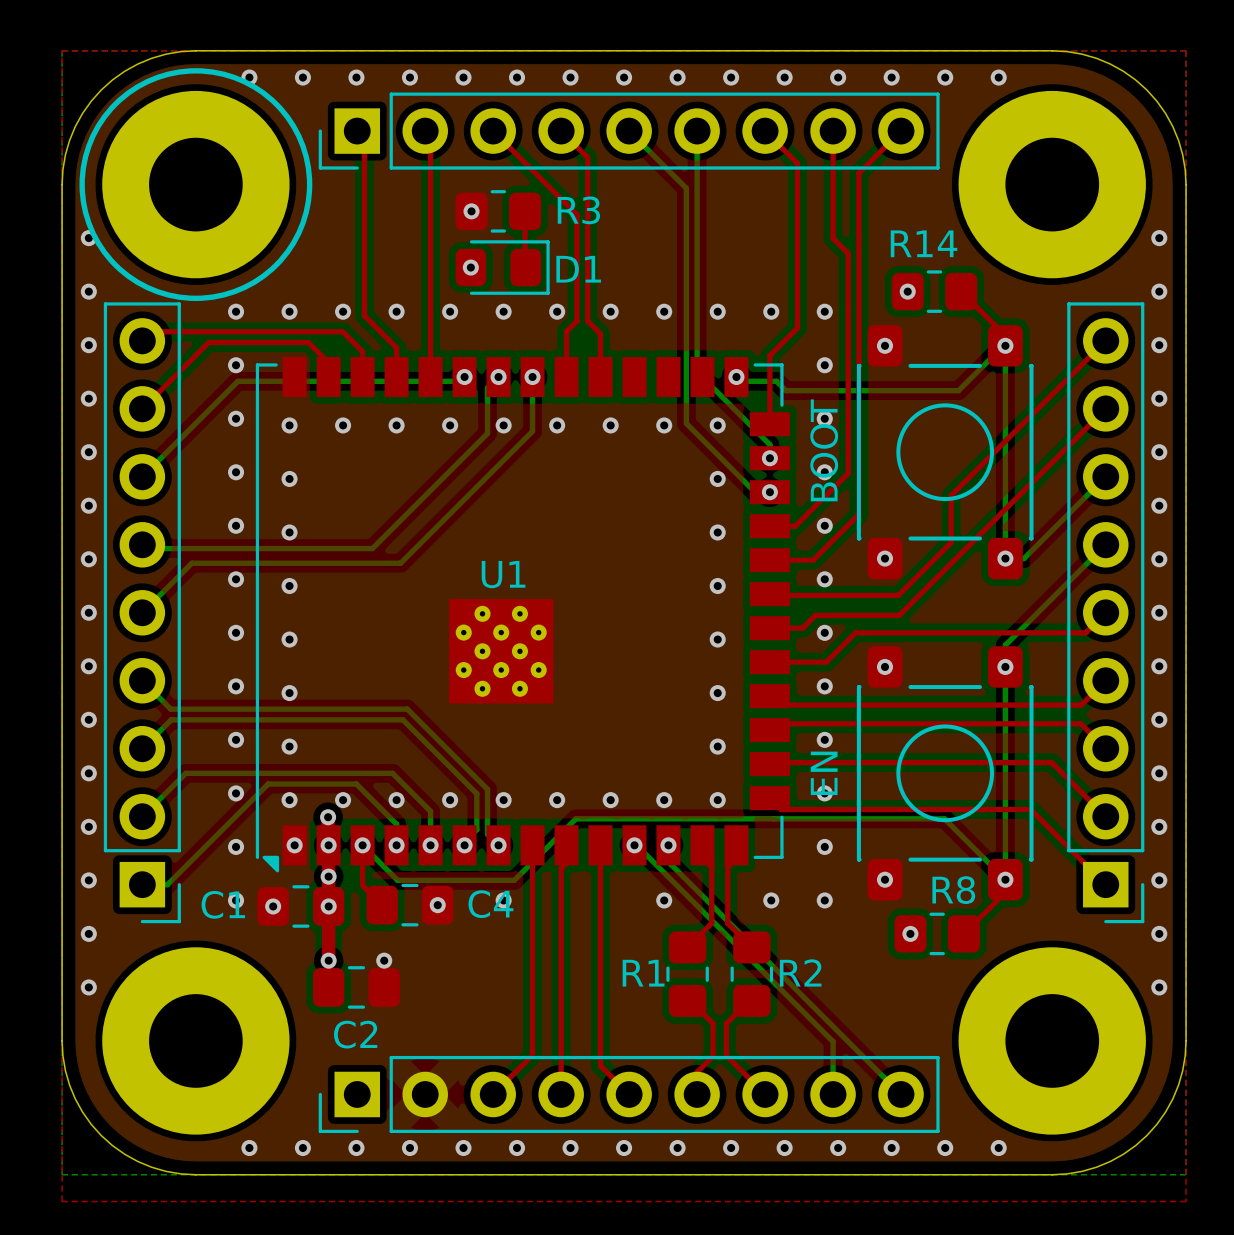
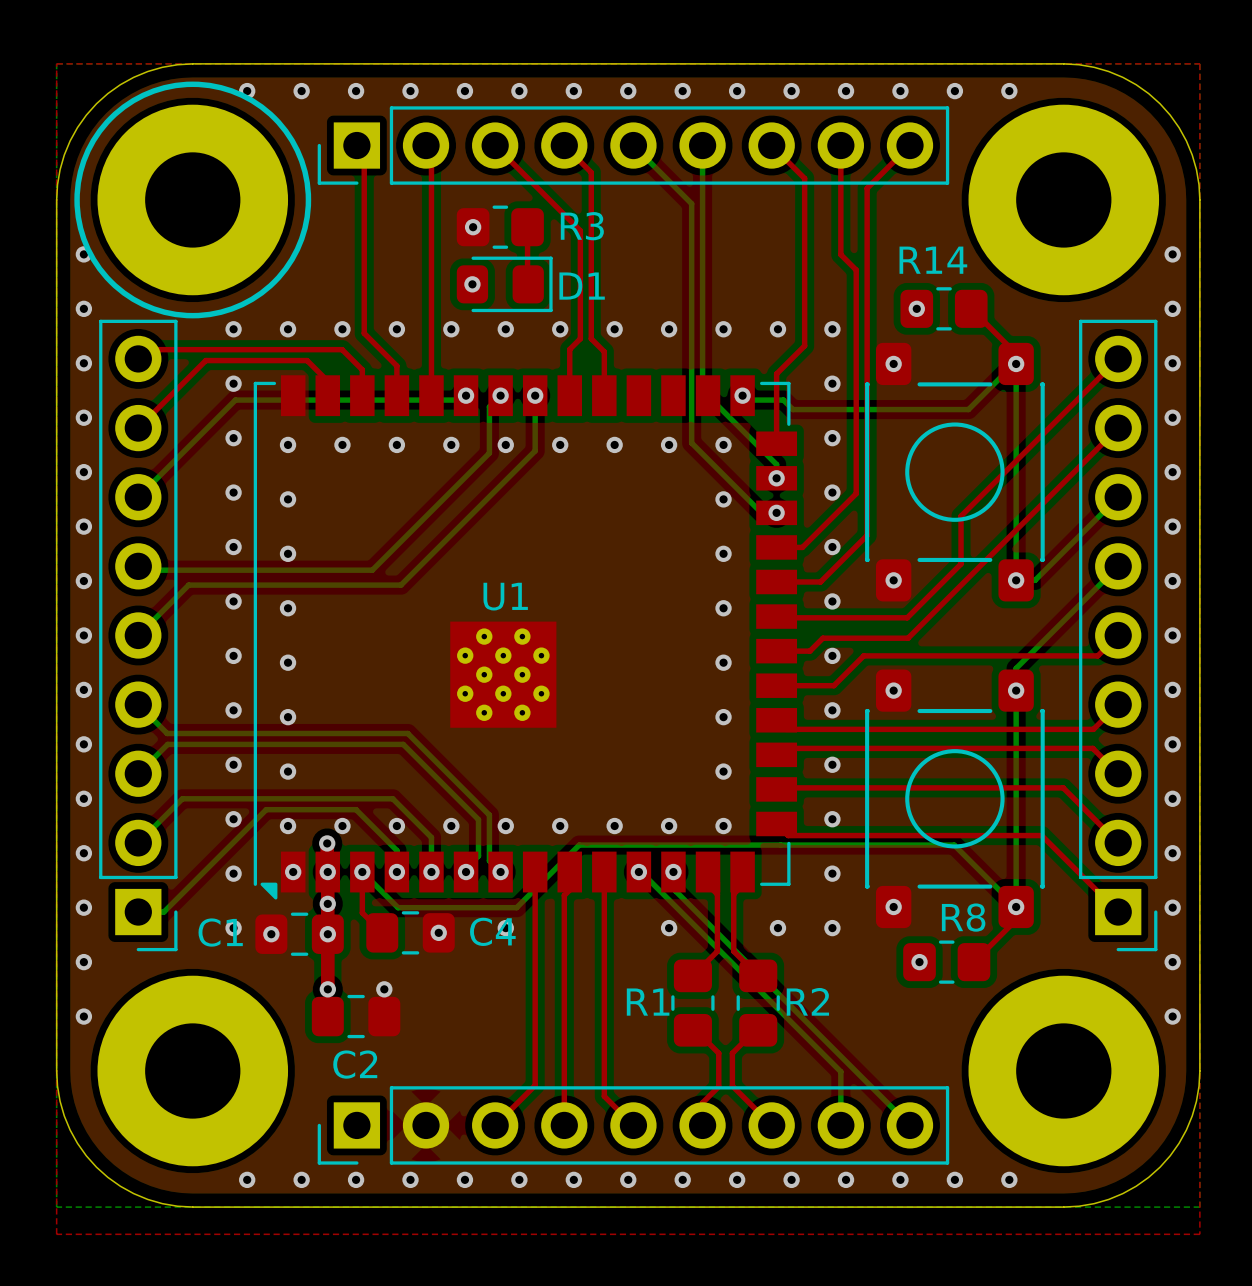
text: BOOT (824, 450) -> none
text: EN (824, 773) -> none

